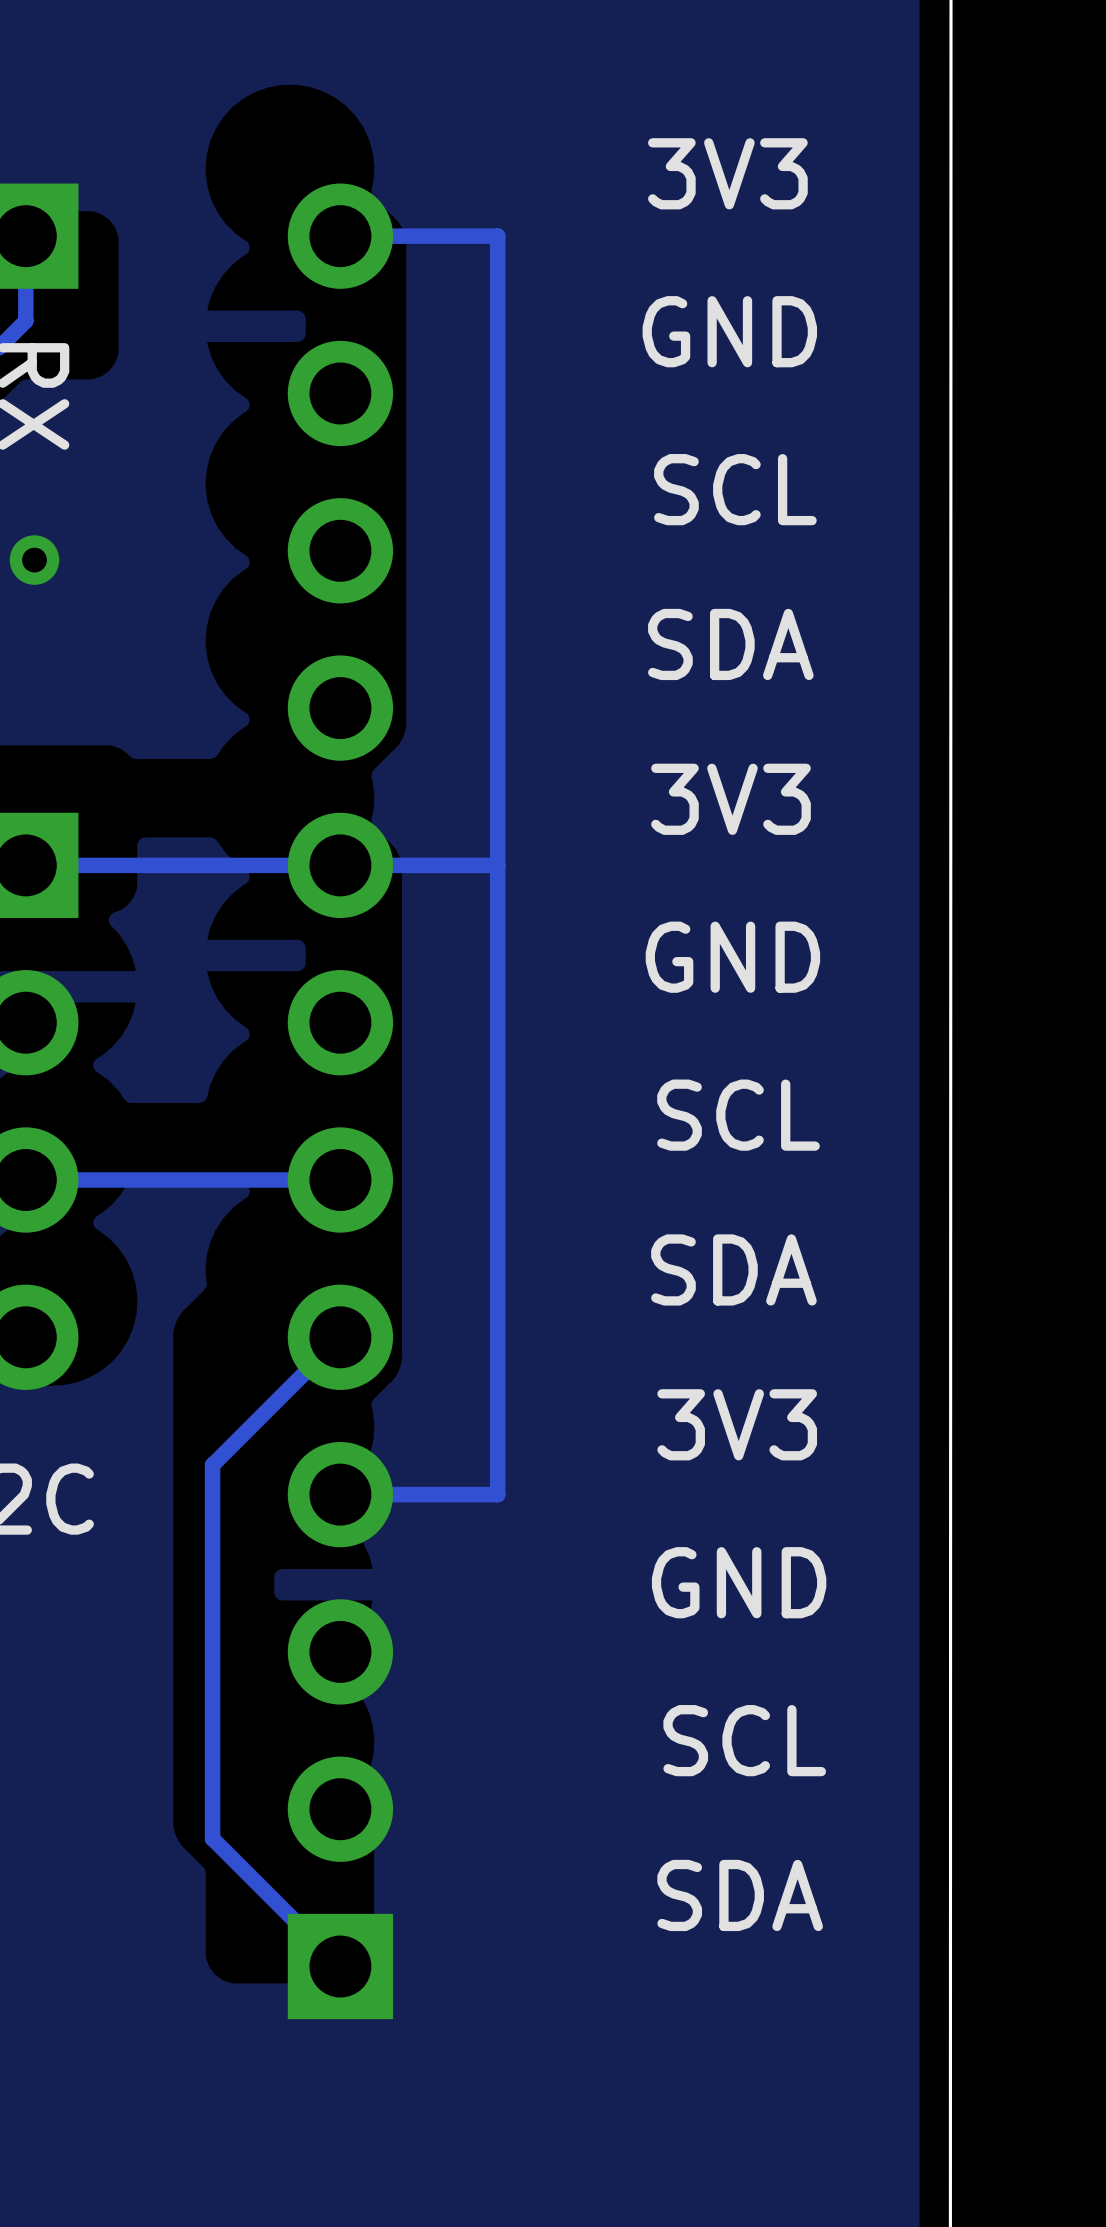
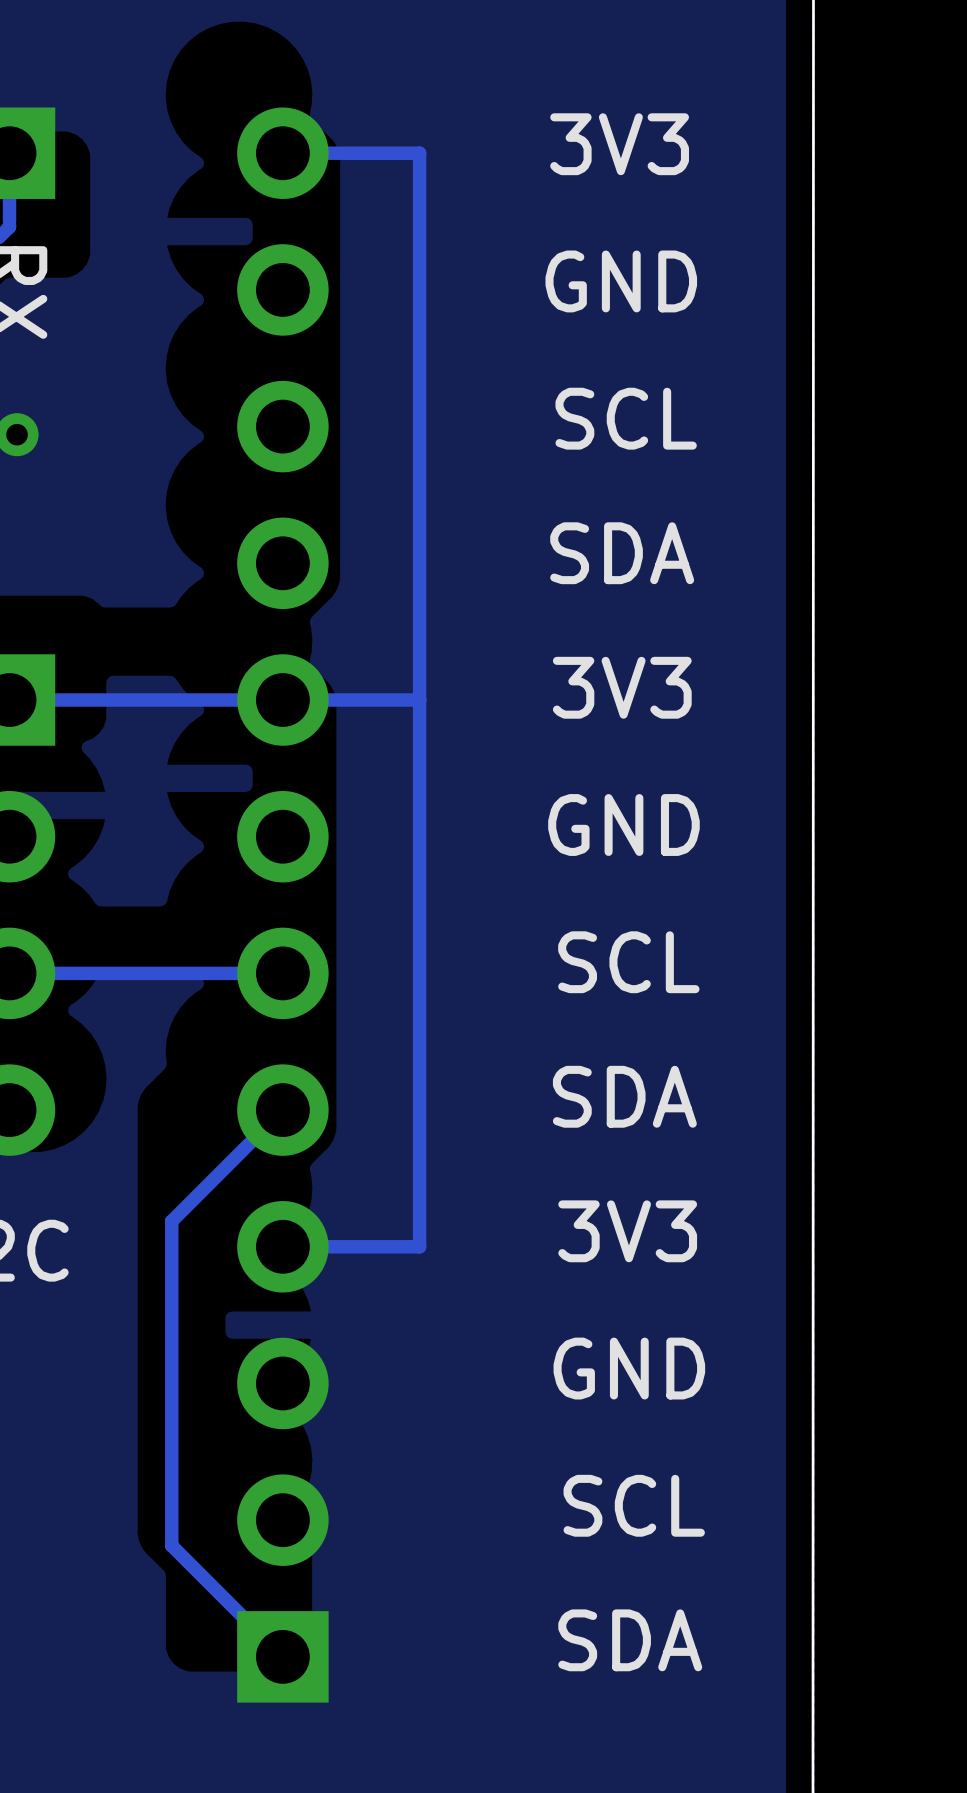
text position: 3V3 (727, 173) -> 3V3 (619, 144)
text position: GND (729, 331) -> GND (621, 281)
text position: SCL (735, 489) -> SCL (626, 418)
text position: SDA (730, 644) -> SDA (622, 553)
text position: 3V3 (731, 799) -> 3V3 (622, 687)
text position: GND (732, 957) -> GND (623, 825)
text position: SCL (738, 1115) -> SCL (628, 962)
text position: SDA (733, 1269) -> SDA (624, 1096)
text position: 3V3 (737, 1424) -> 3V3 (627, 1231)
text position: GND (739, 1582) -> GND (629, 1368)
text position: SCL (744, 1740) -> SCL (634, 1505)
text position: SDA (740, 1895) -> SDA (630, 1640)

